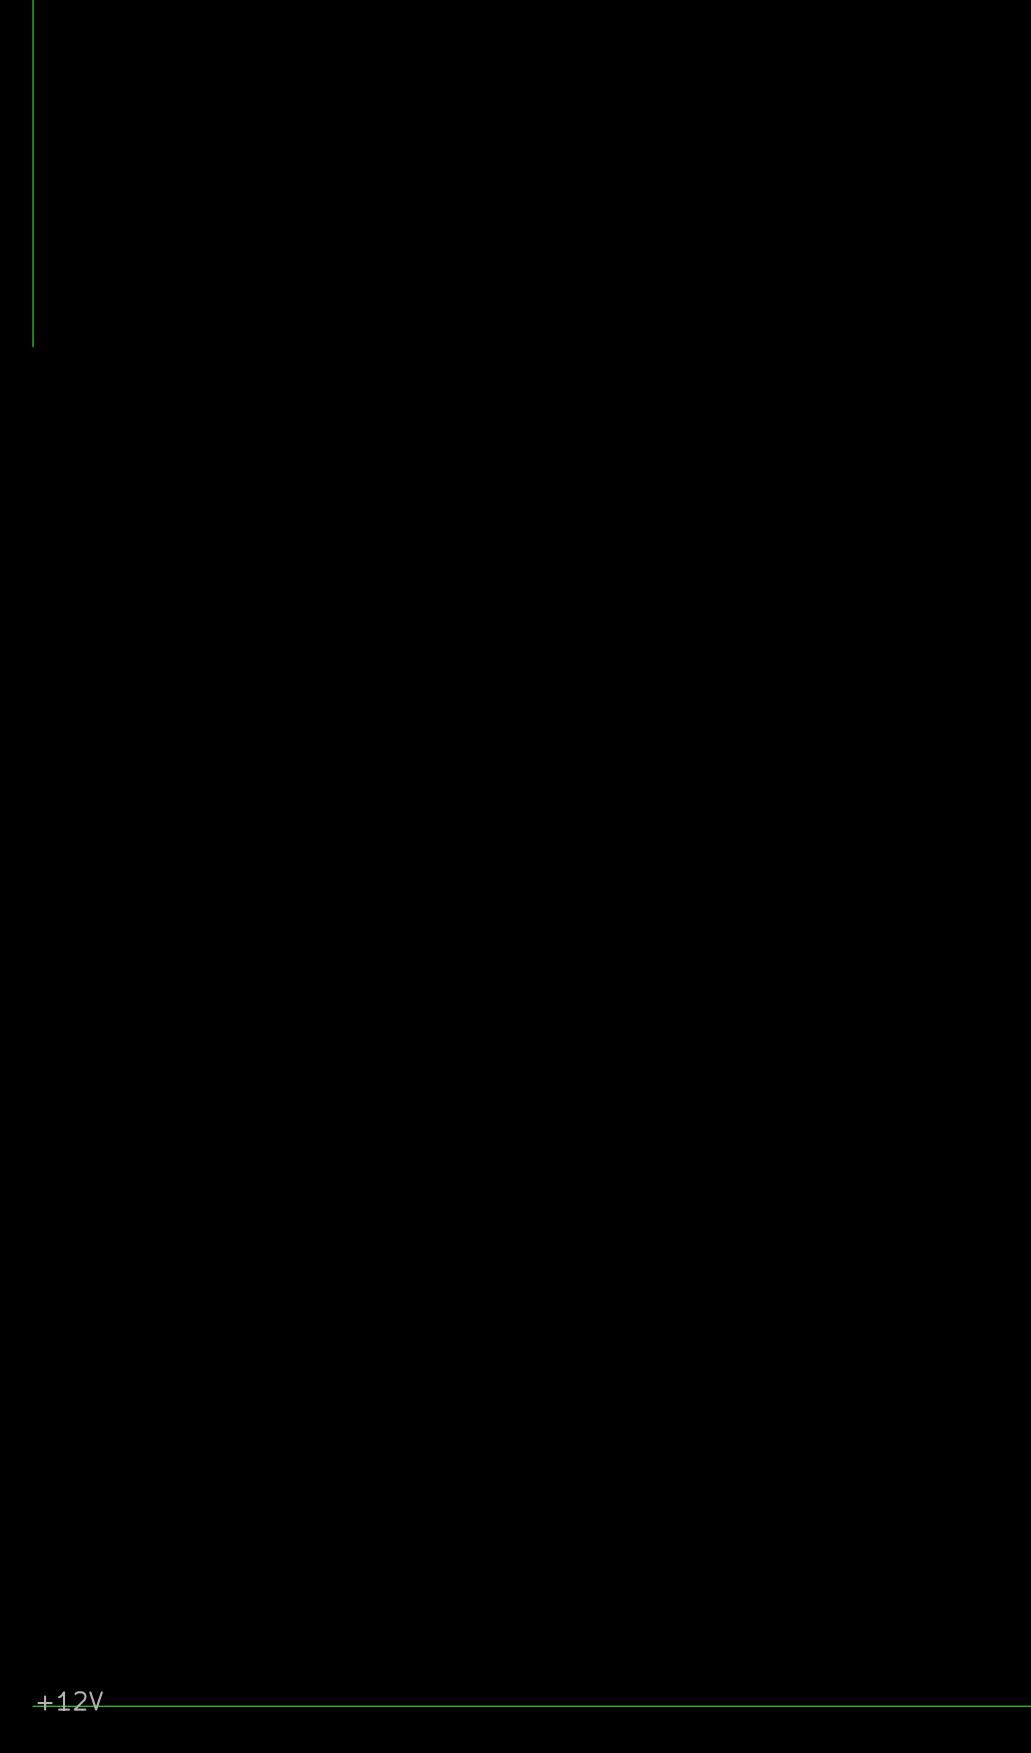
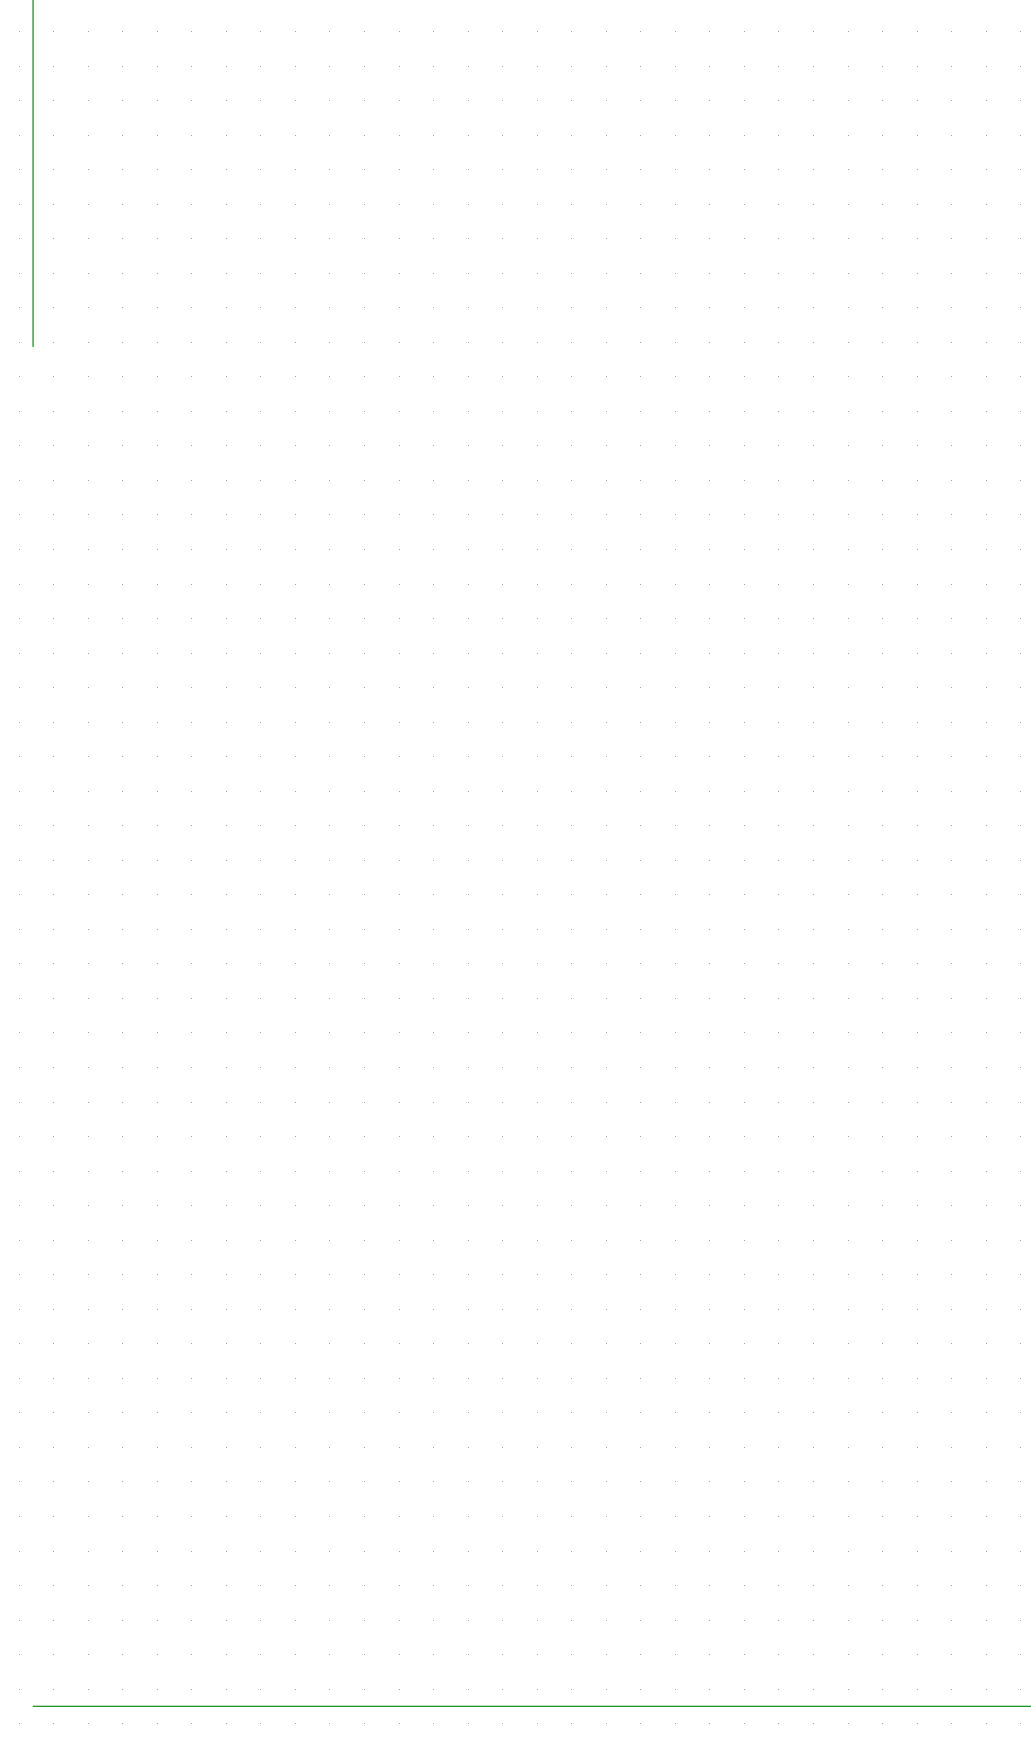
label: +12V (70, 1700) -> none

